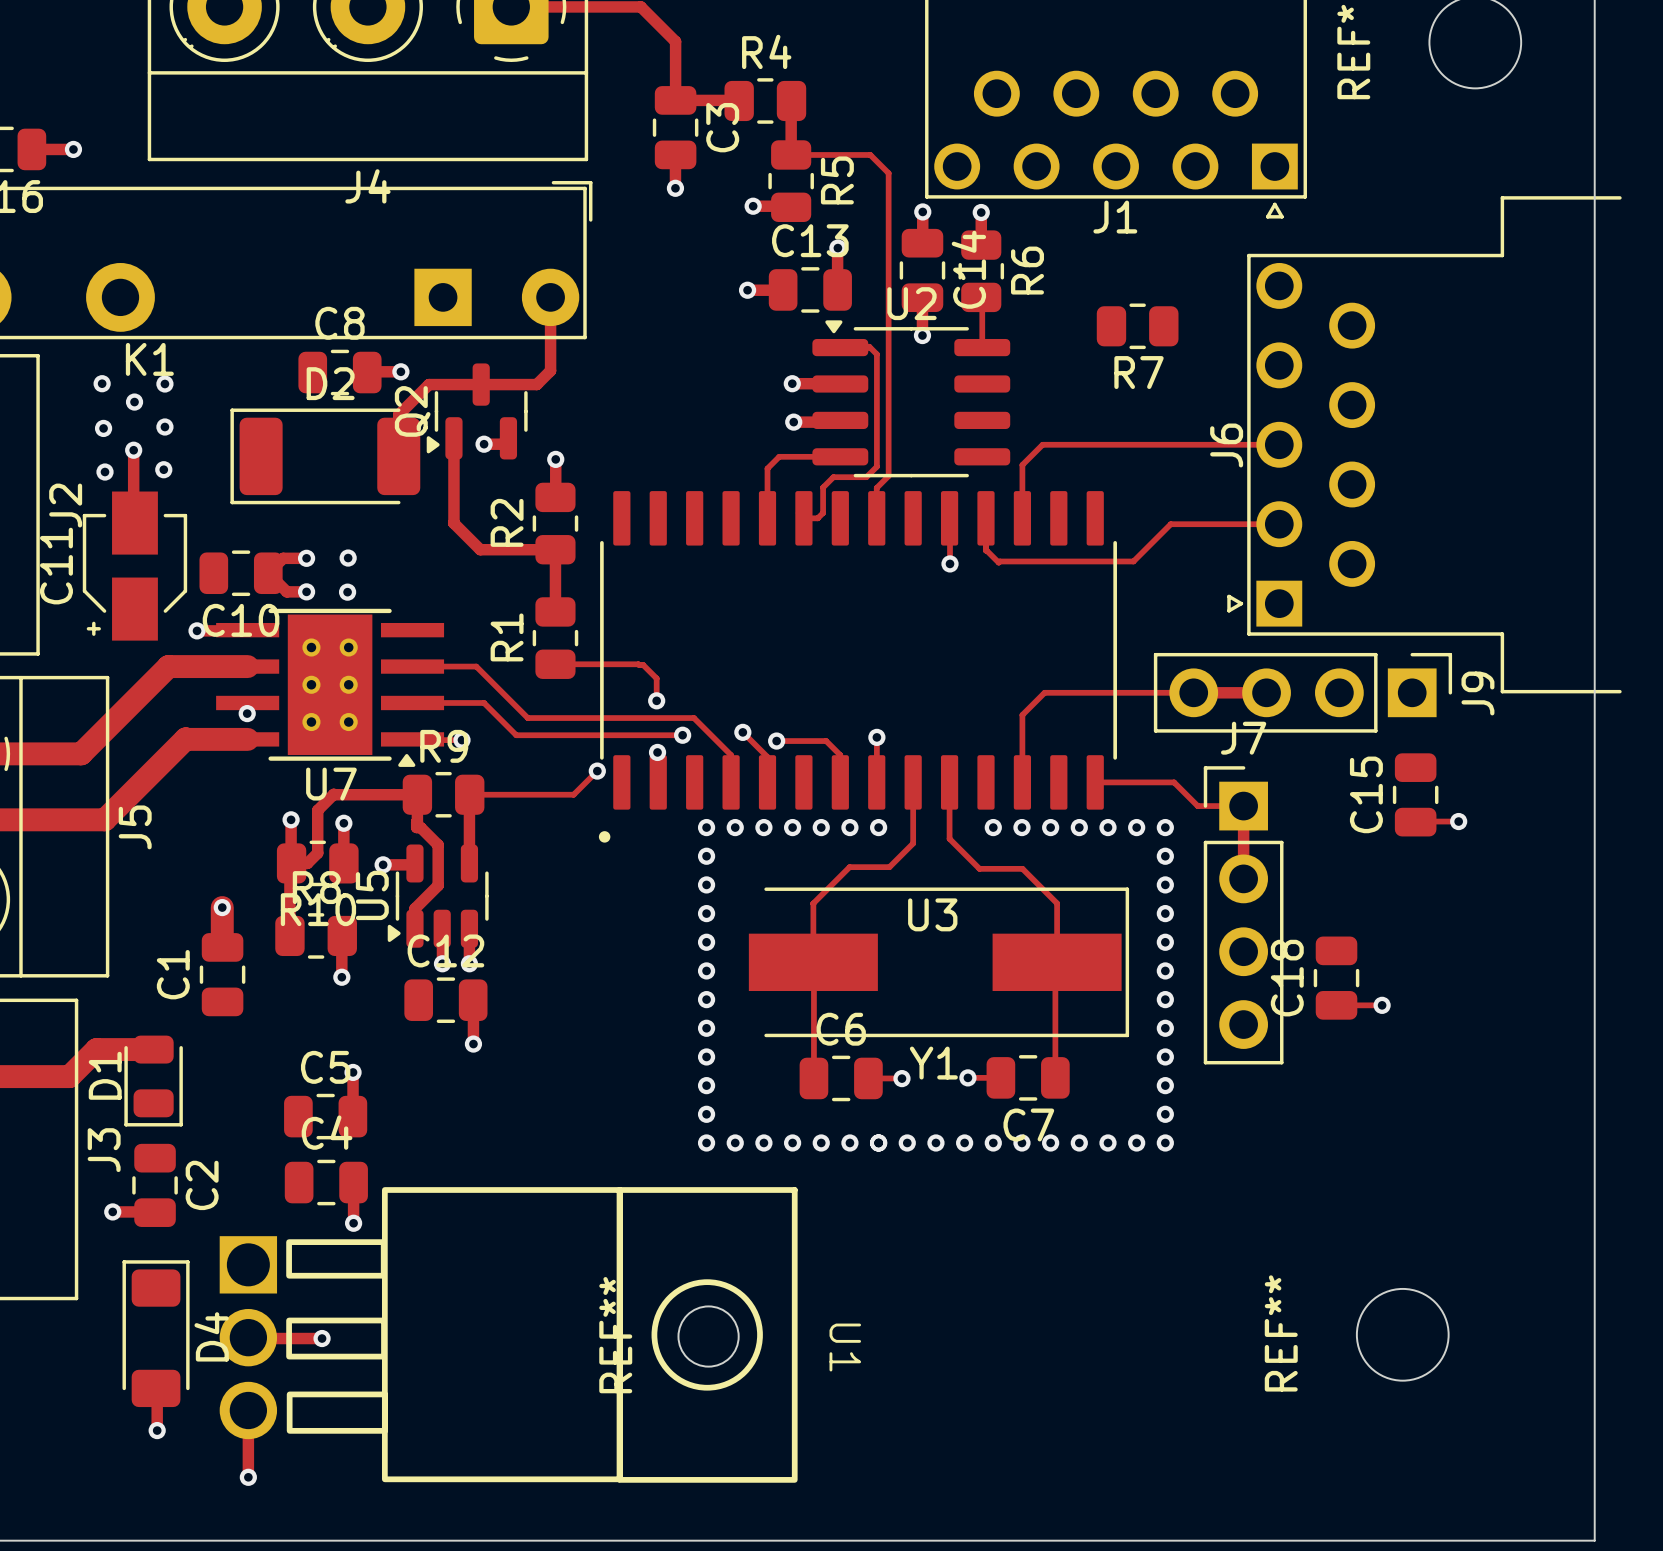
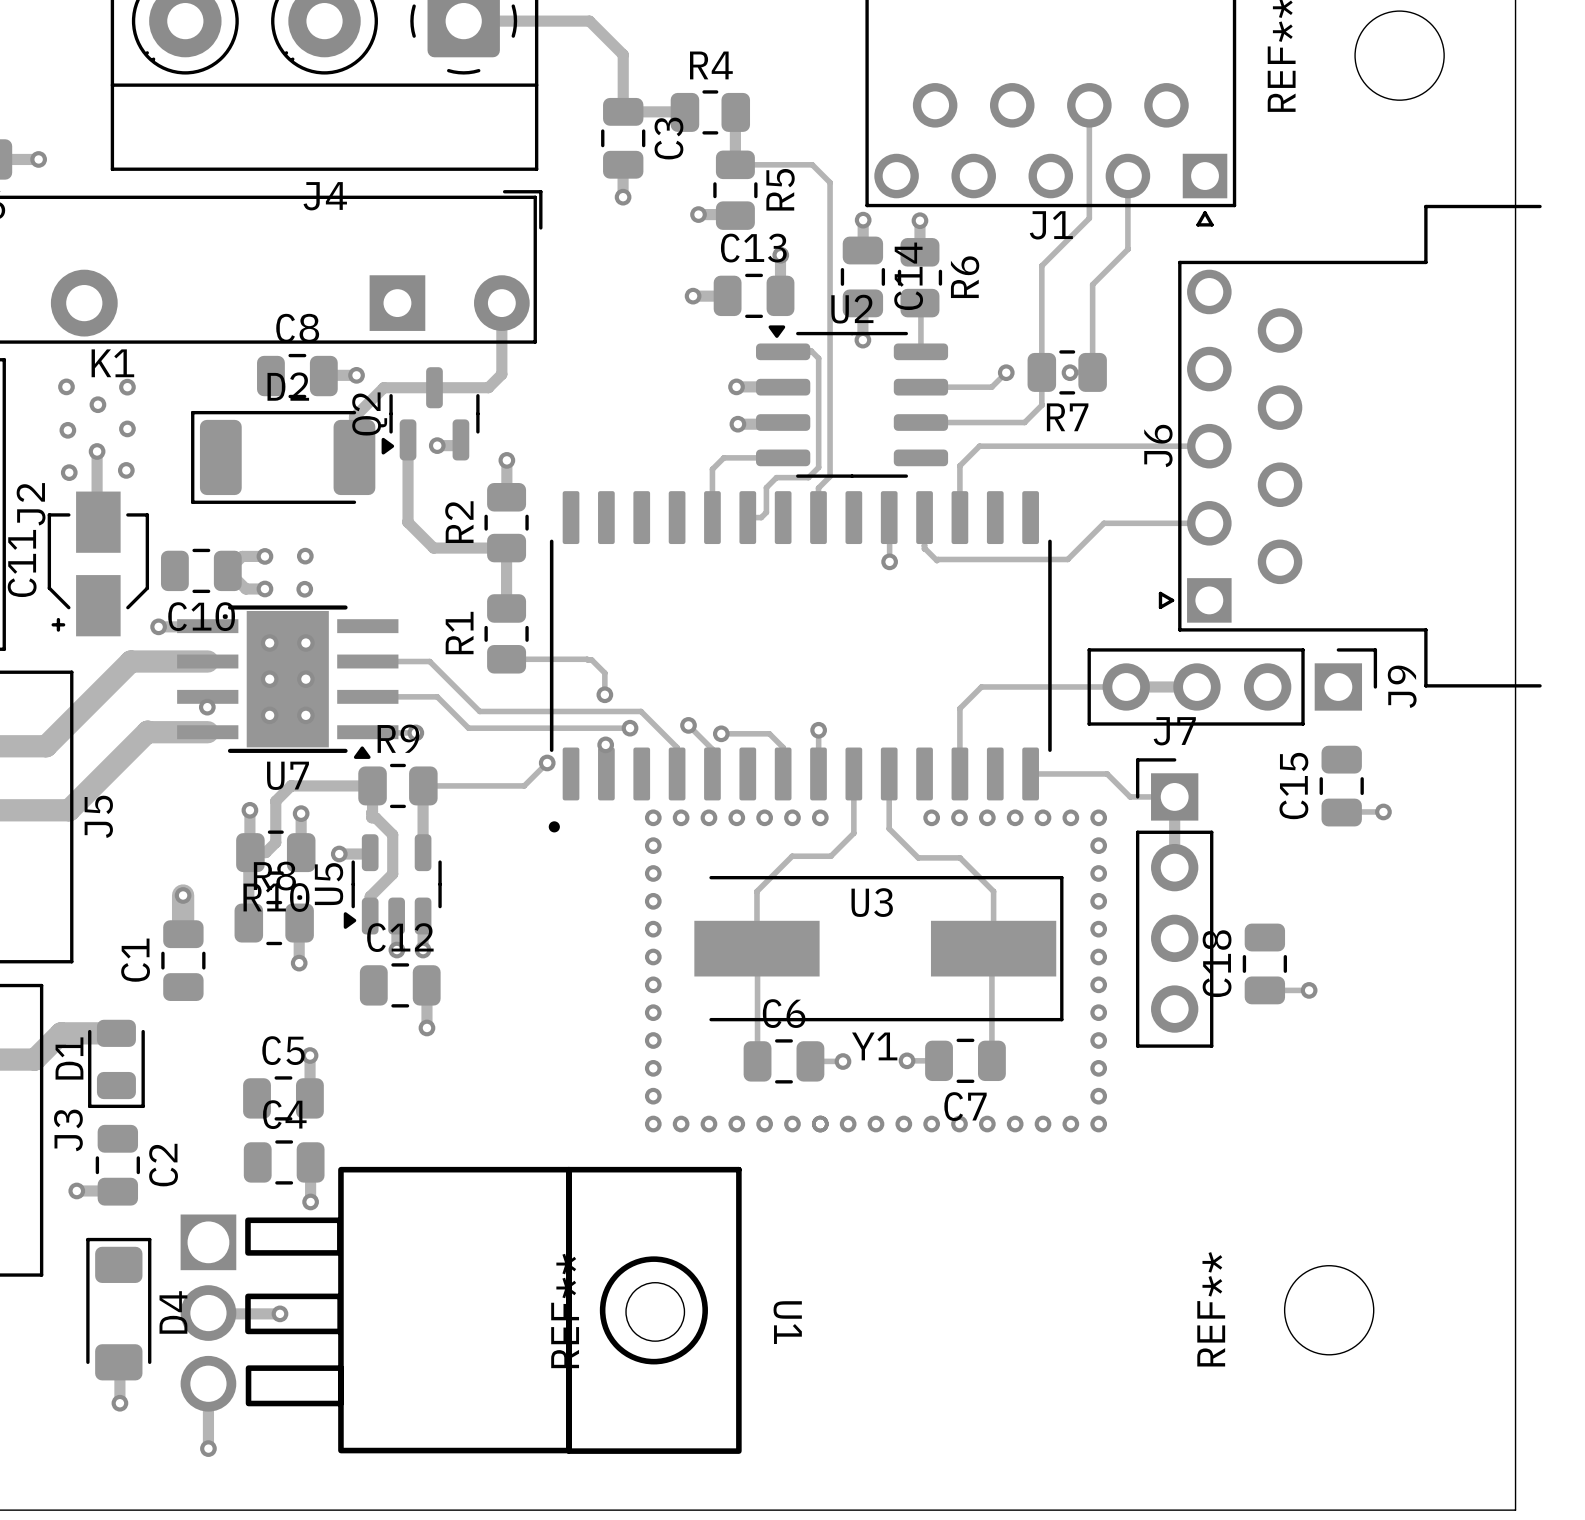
track: none -> (1089, 105) (1089, 218) (1041, 265) (1041, 404)
track: none -> (1127, 176) (1127, 248)
track: none -> (1128, 249) (1092, 284) (1092, 372) (1070, 372)
R7 position: (1137, 326) -> (1067, 372)
track: none -> (1006, 372) (991, 387) (920, 387)
via: none -> (1006, 372)
via: none -> (1070, 372)
track: none -> (1042, 404) (1024, 422) (920, 422)

